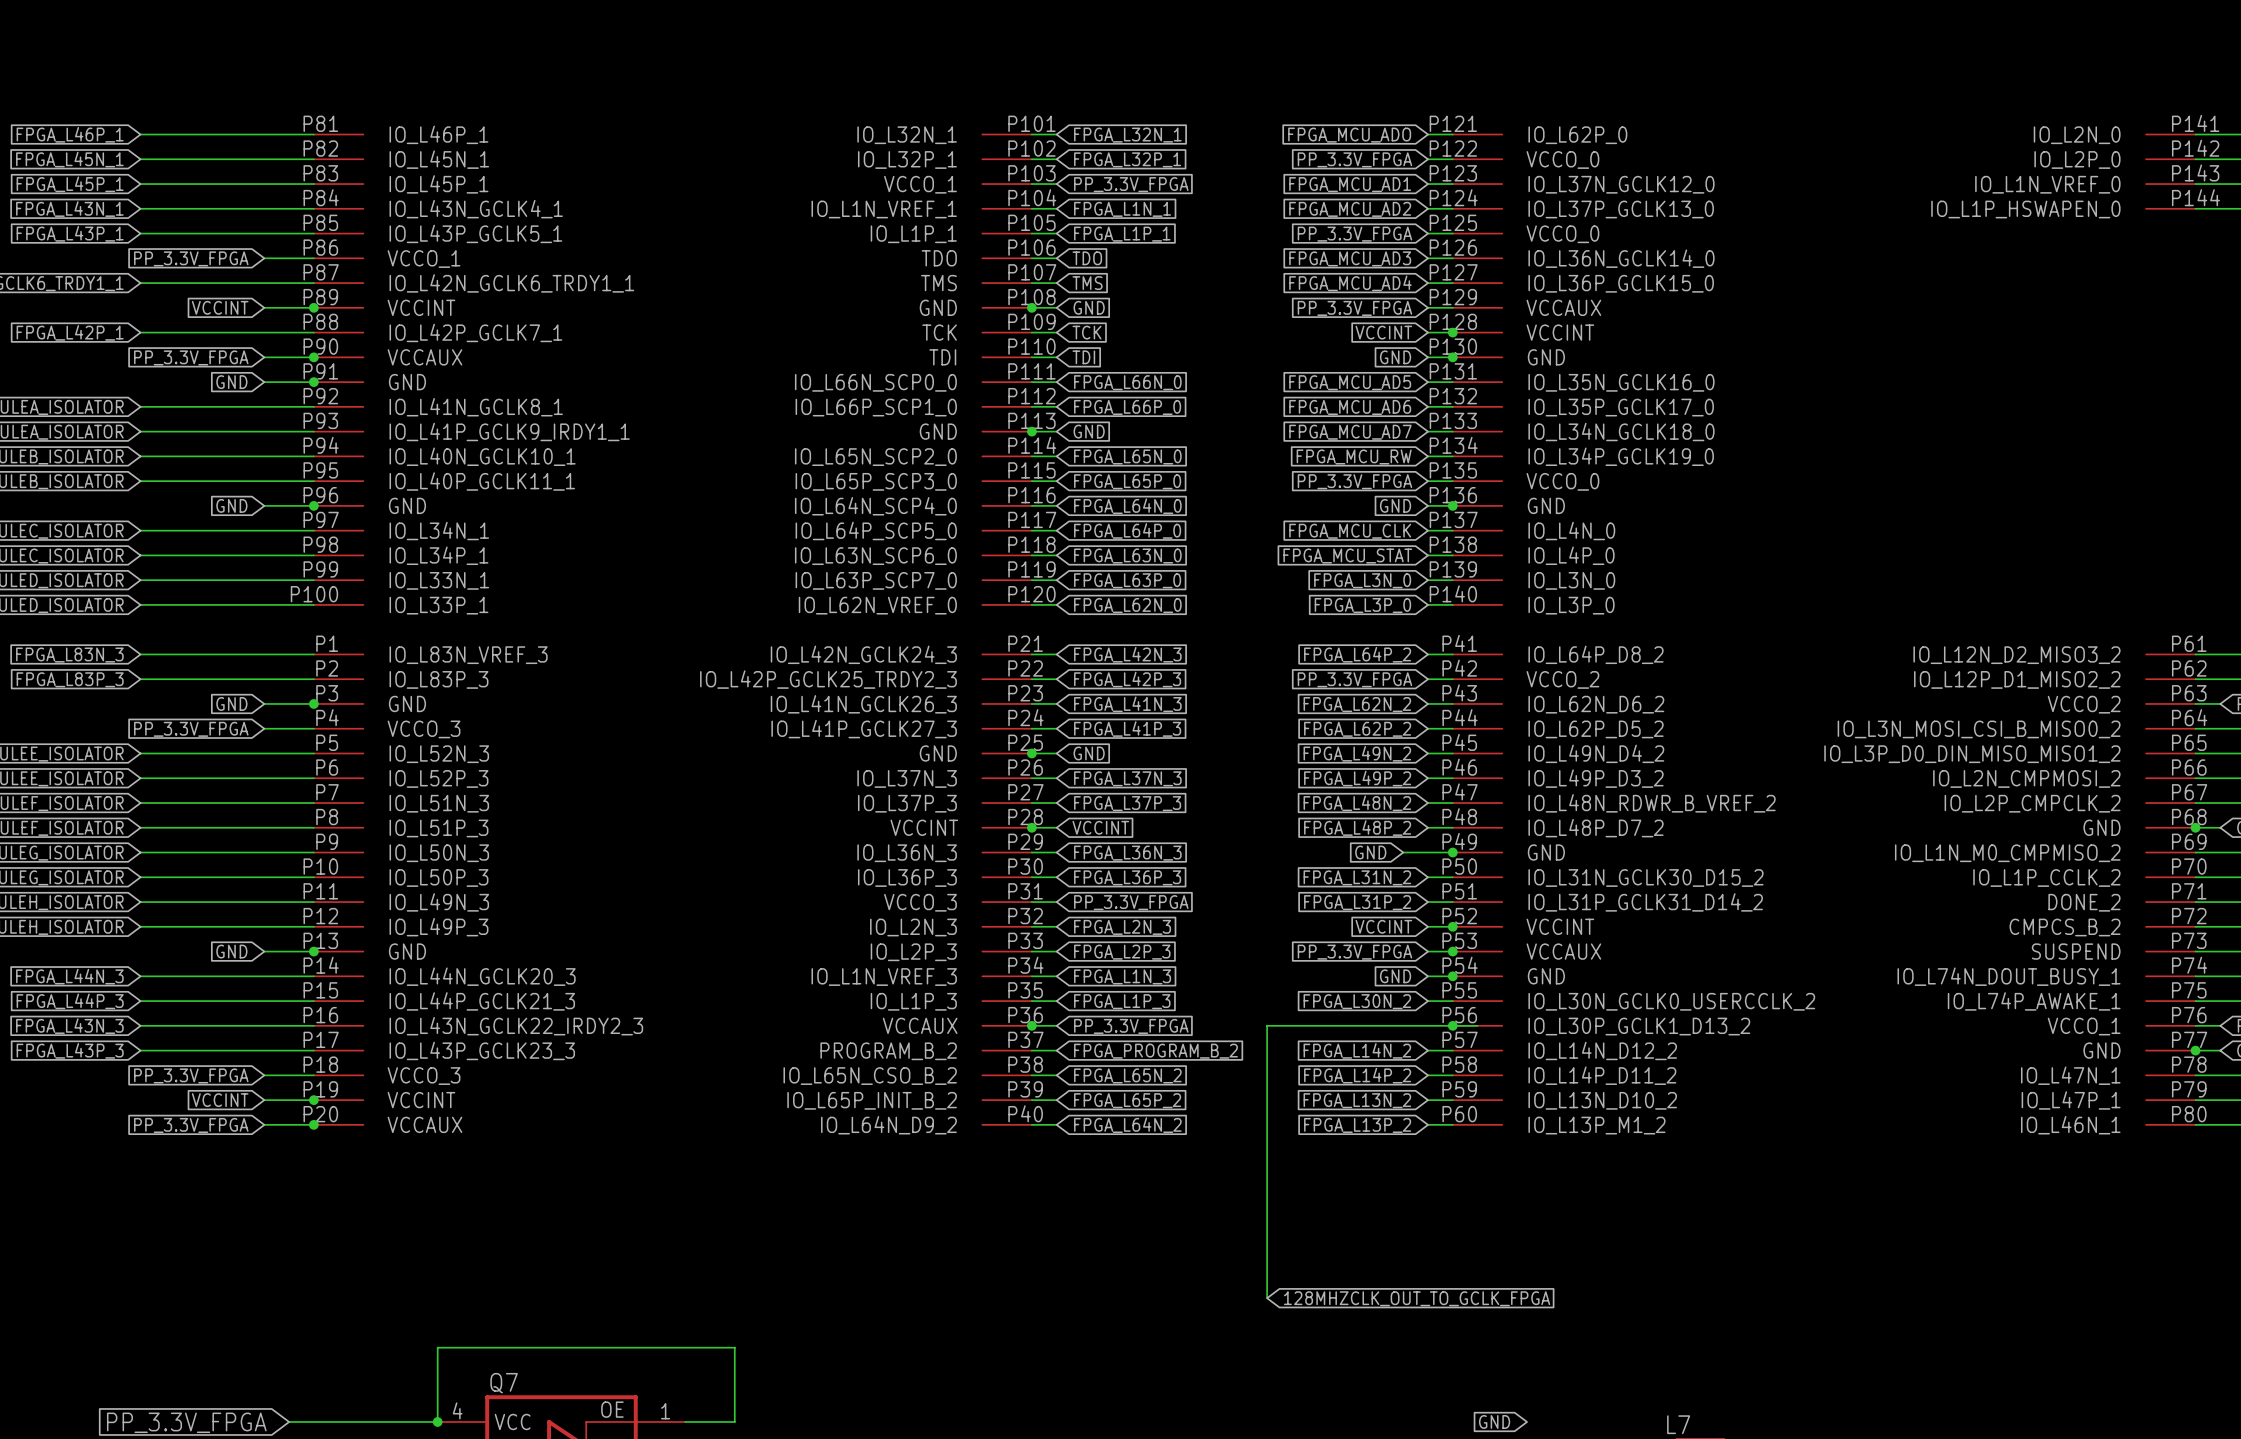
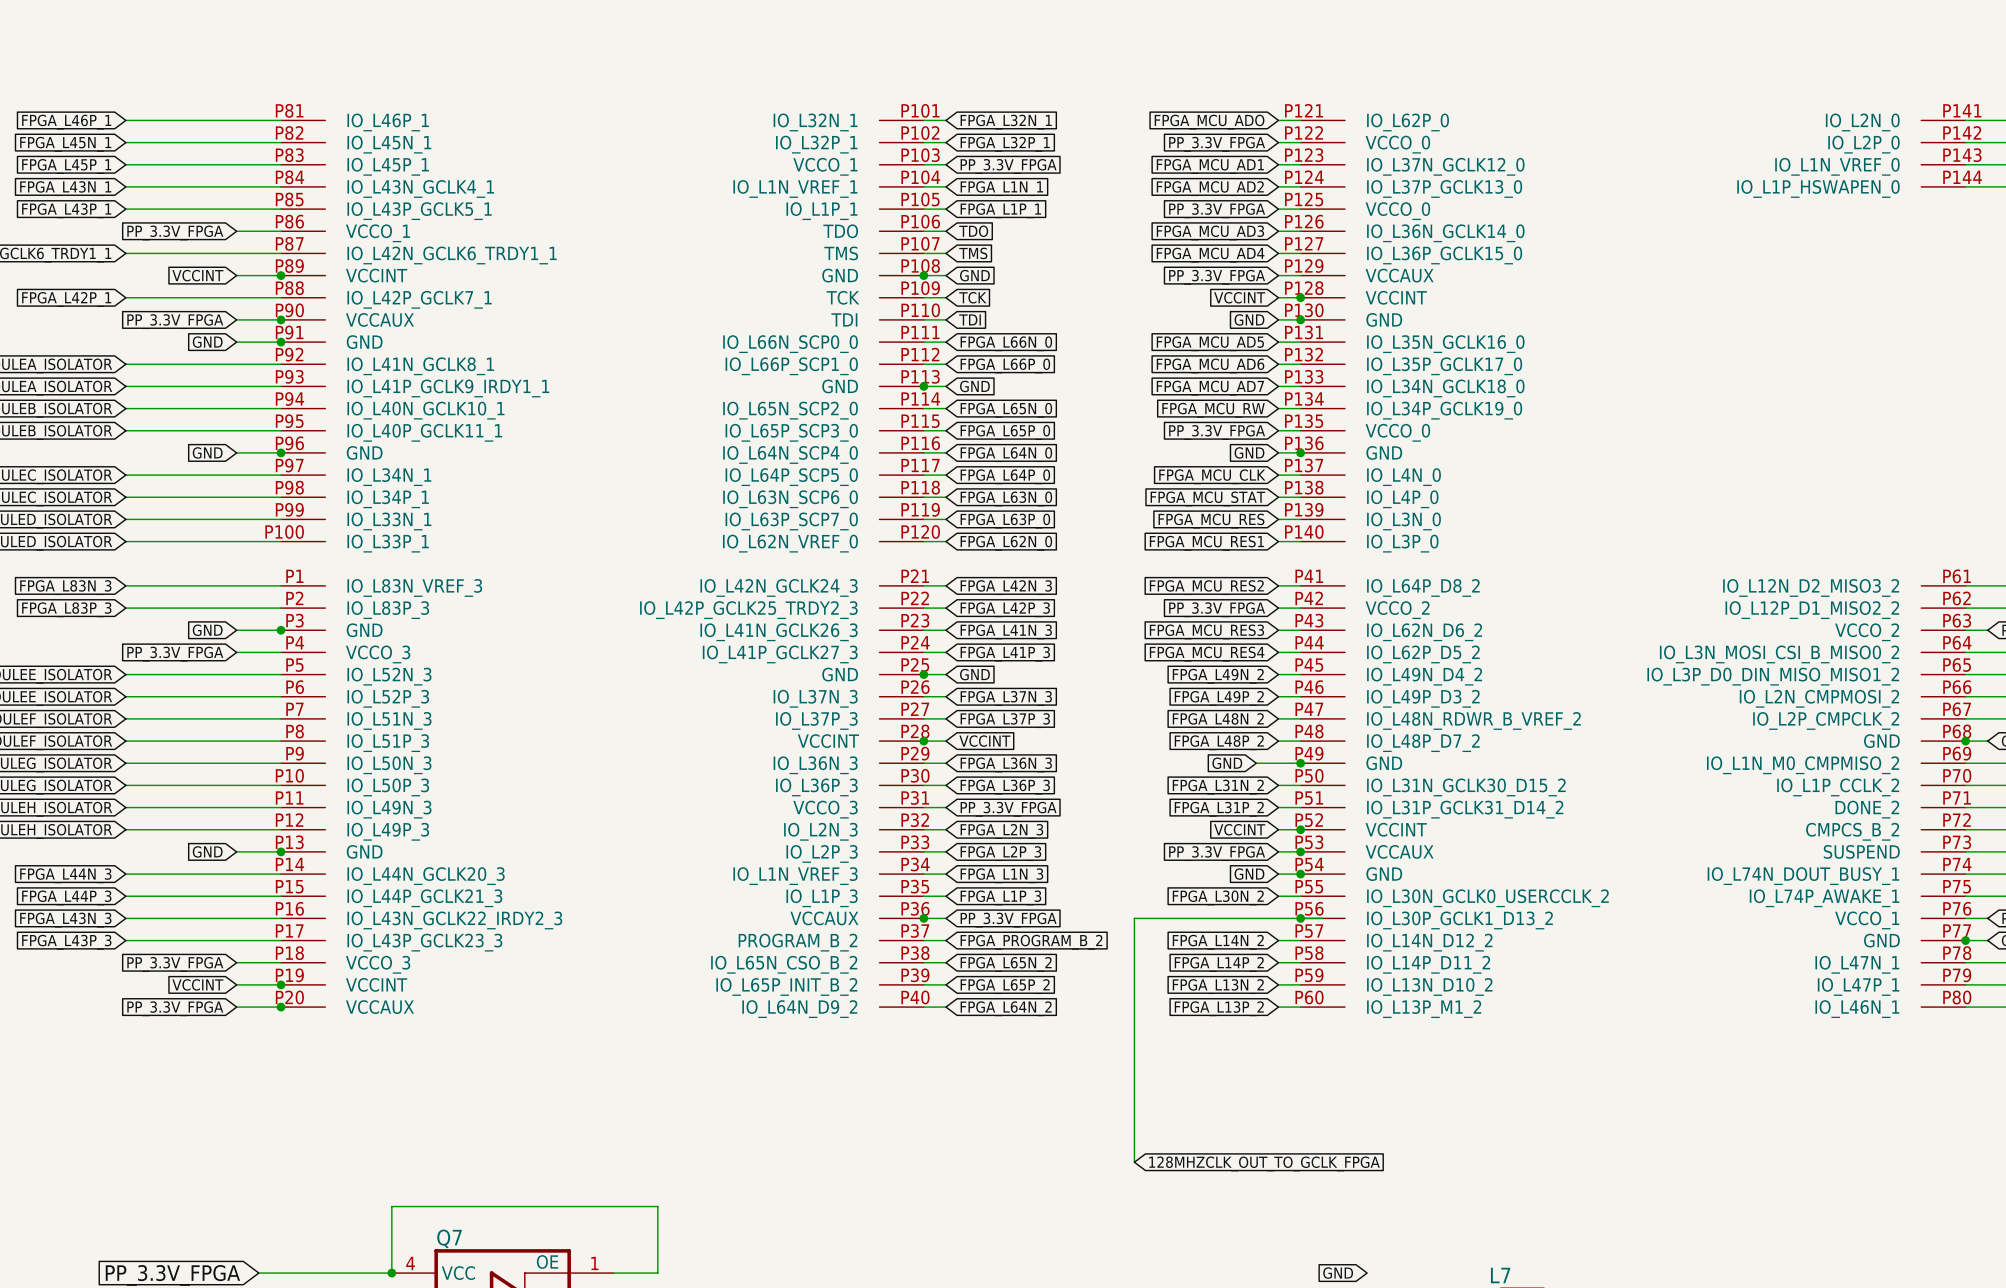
global label: FPGA_L3N_0 (1362, 580) -> FPGA_MCU_RES (1211, 521)
global label: FPGA_L3P_0 (1362, 605) -> FPGA_MCU_RES1 (1206, 543)
global label: FPGA_L64P_2 (1357, 654) -> FPGA_MCU_RES2 (1206, 587)
global label: FPGA_L62N_2 (1357, 704) -> FPGA_MCU_RES3 (1206, 631)
global label: FPGA_L62P_2 (1357, 729) -> FPGA_MCU_RES4 (1207, 654)

